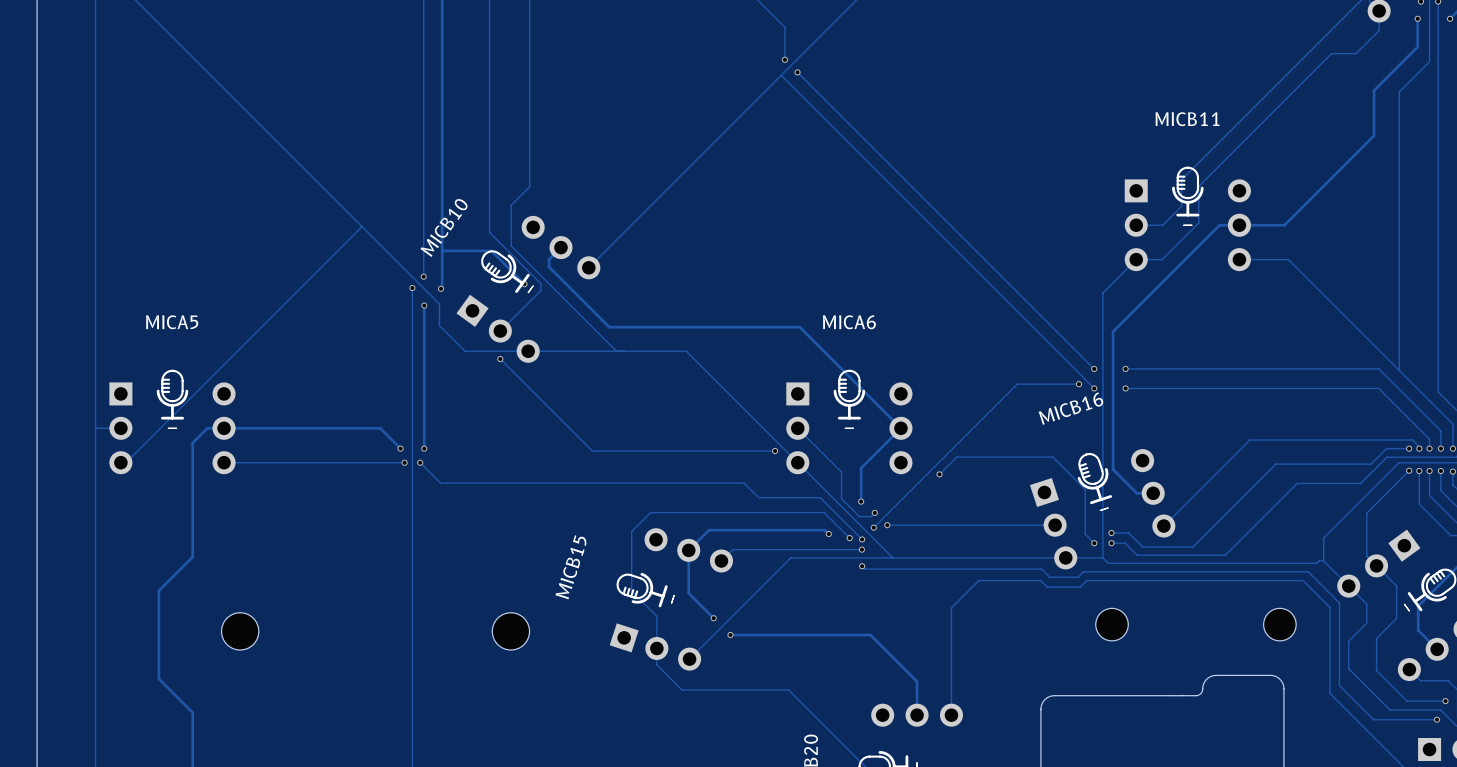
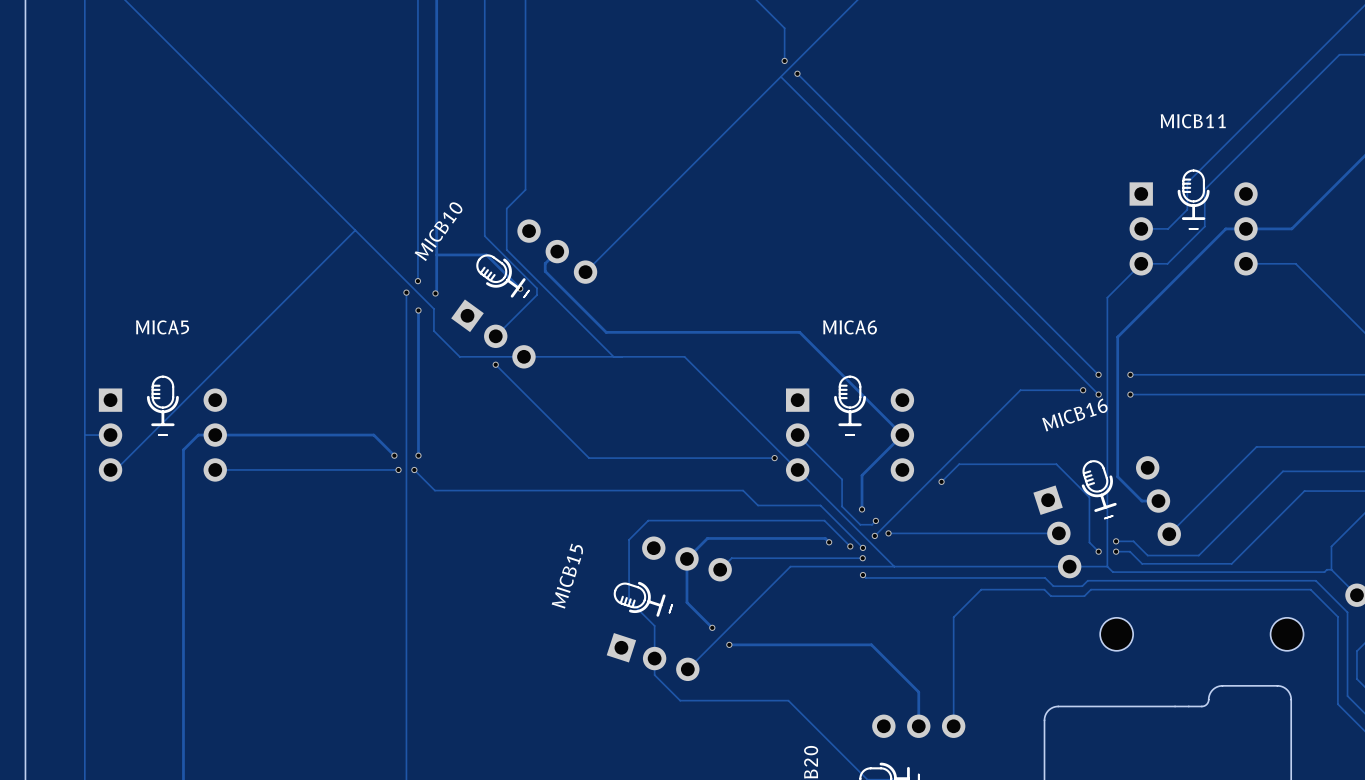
track: (192, 556) (158, 590) (158, 678) (192, 712) -> (183, 565) (183, 723)
part: (240, 631) -> none
part: (510, 631) -> none

